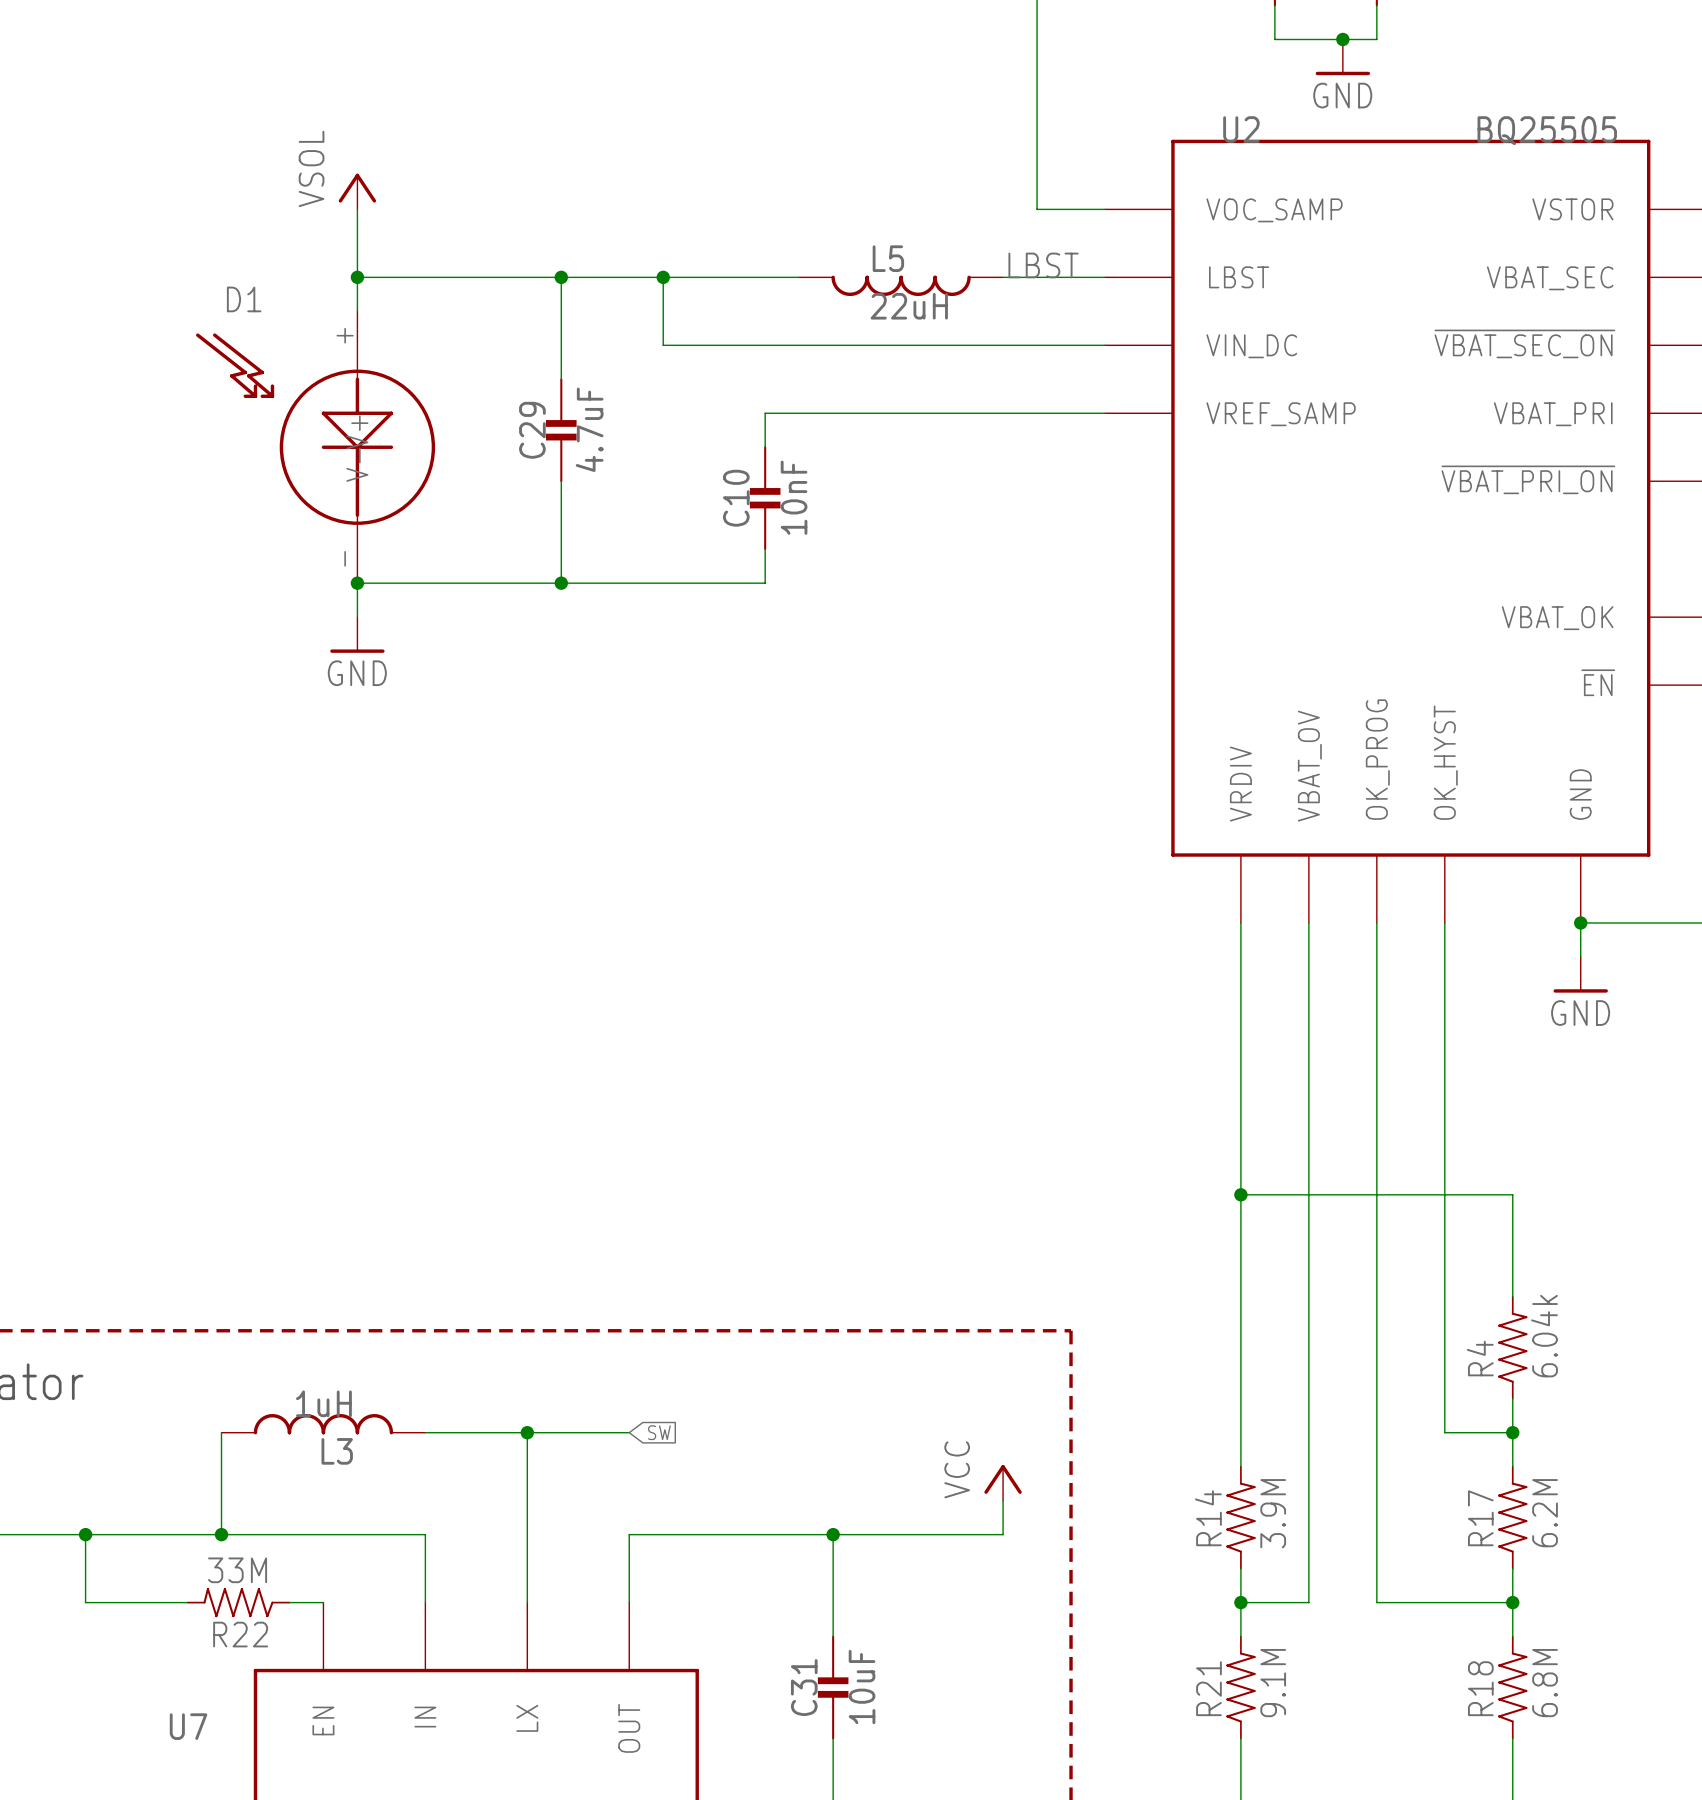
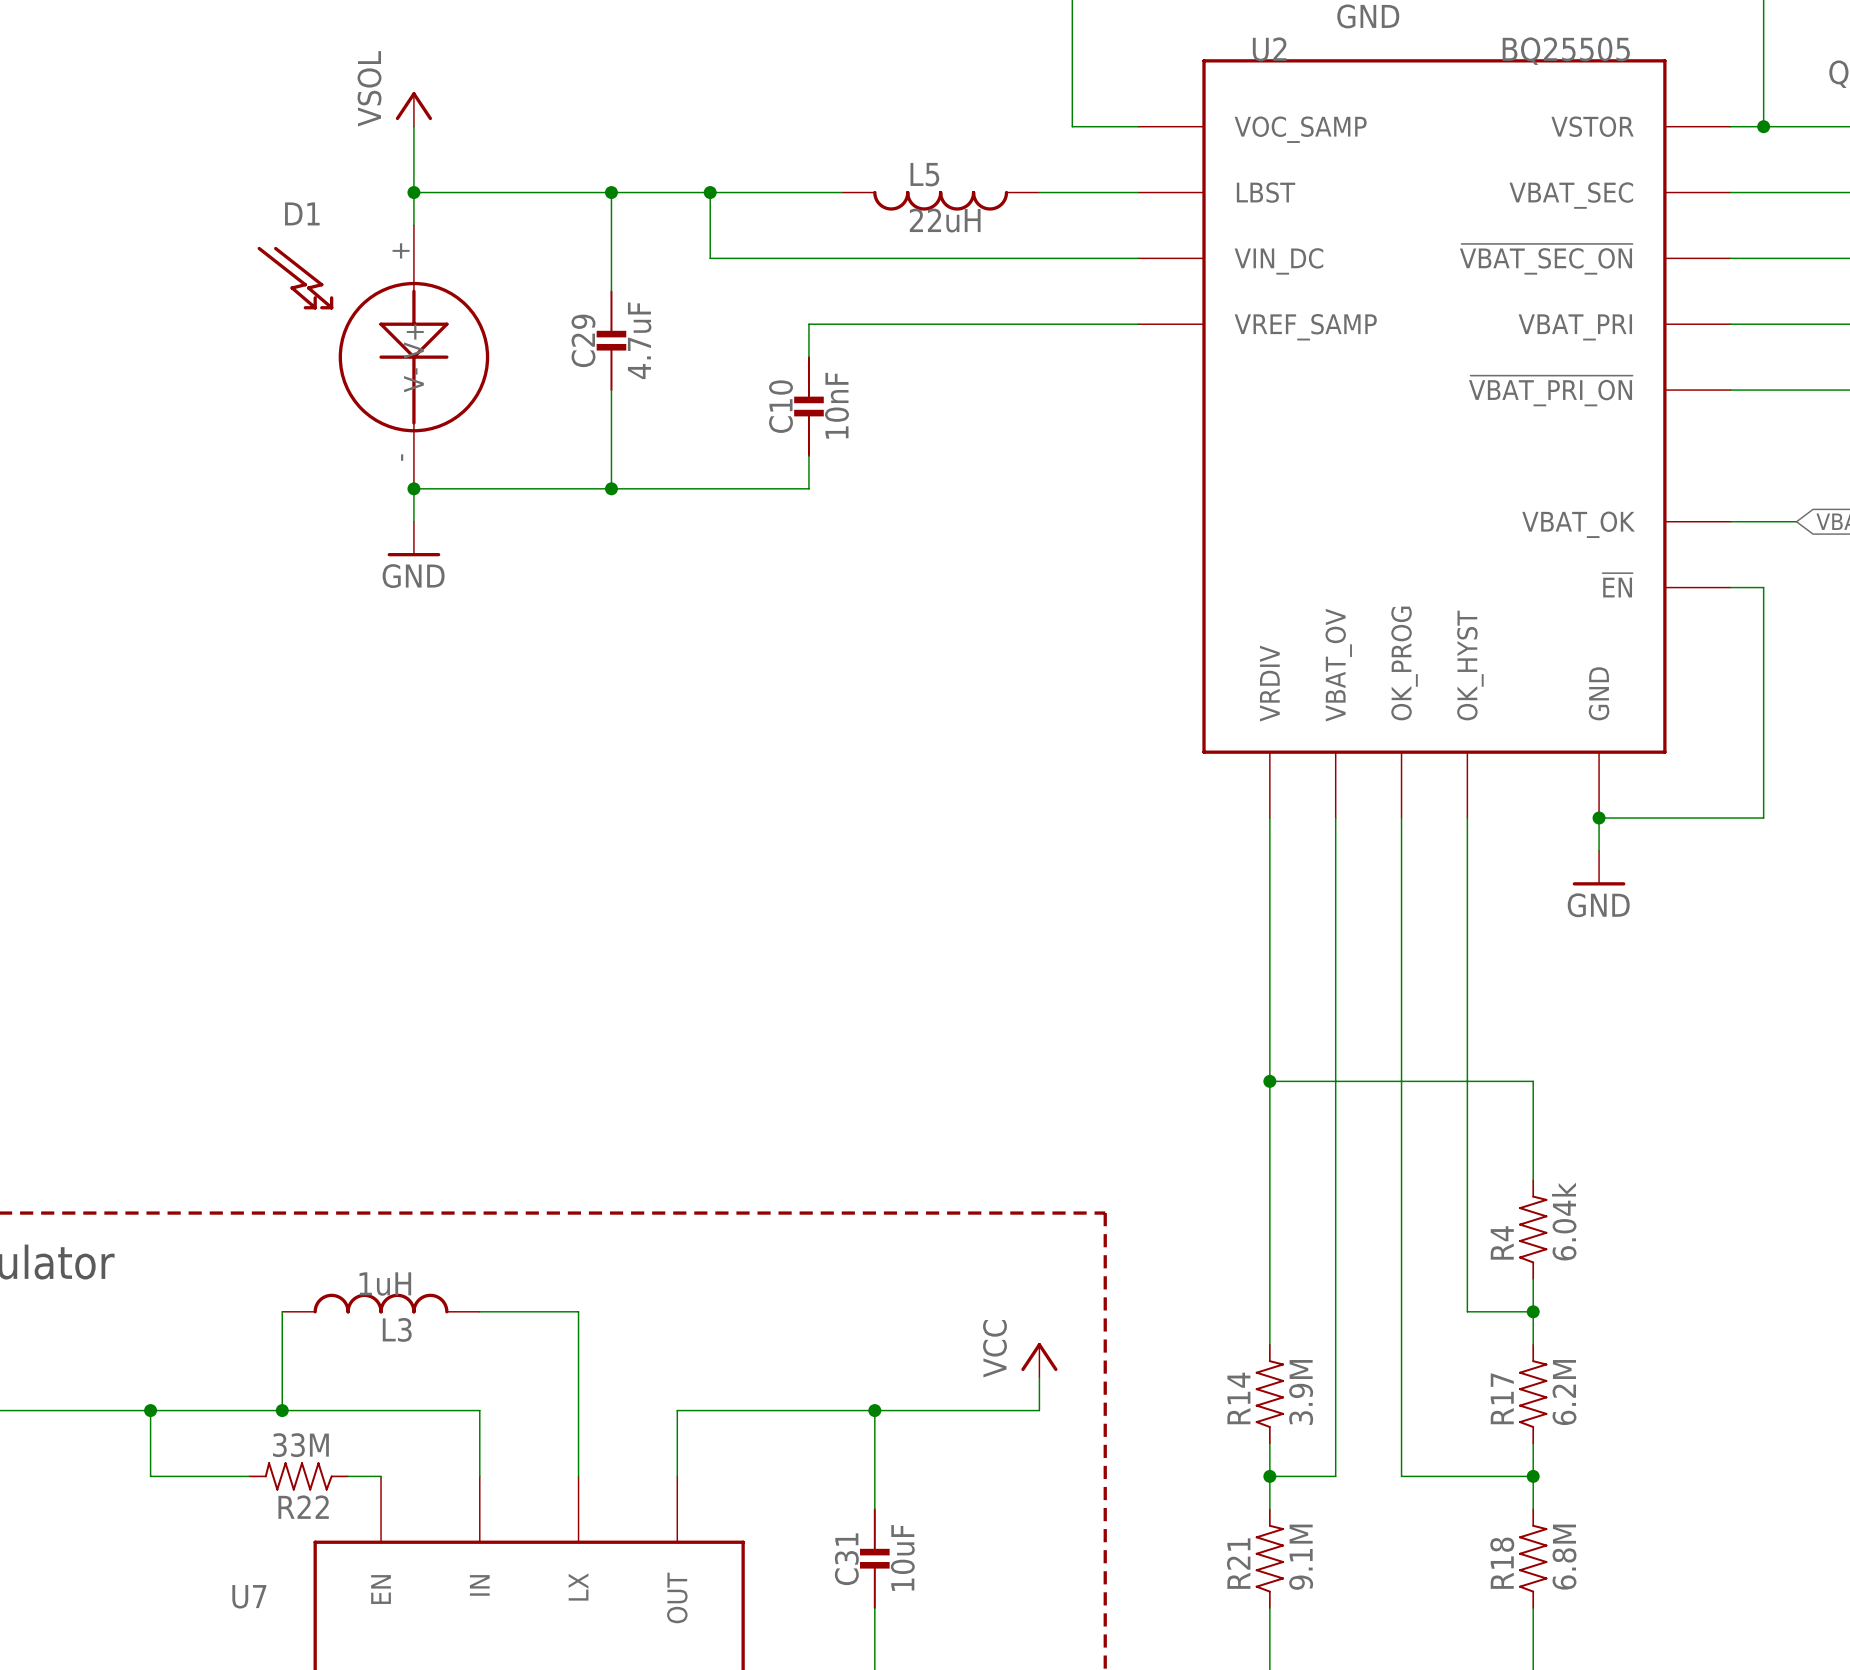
label: LBST (1043, 265) -> none
wire: (527, 1432) (629, 1432) -> none
junction: (527, 1432) -> none
global label: SW (659, 1432) -> none

